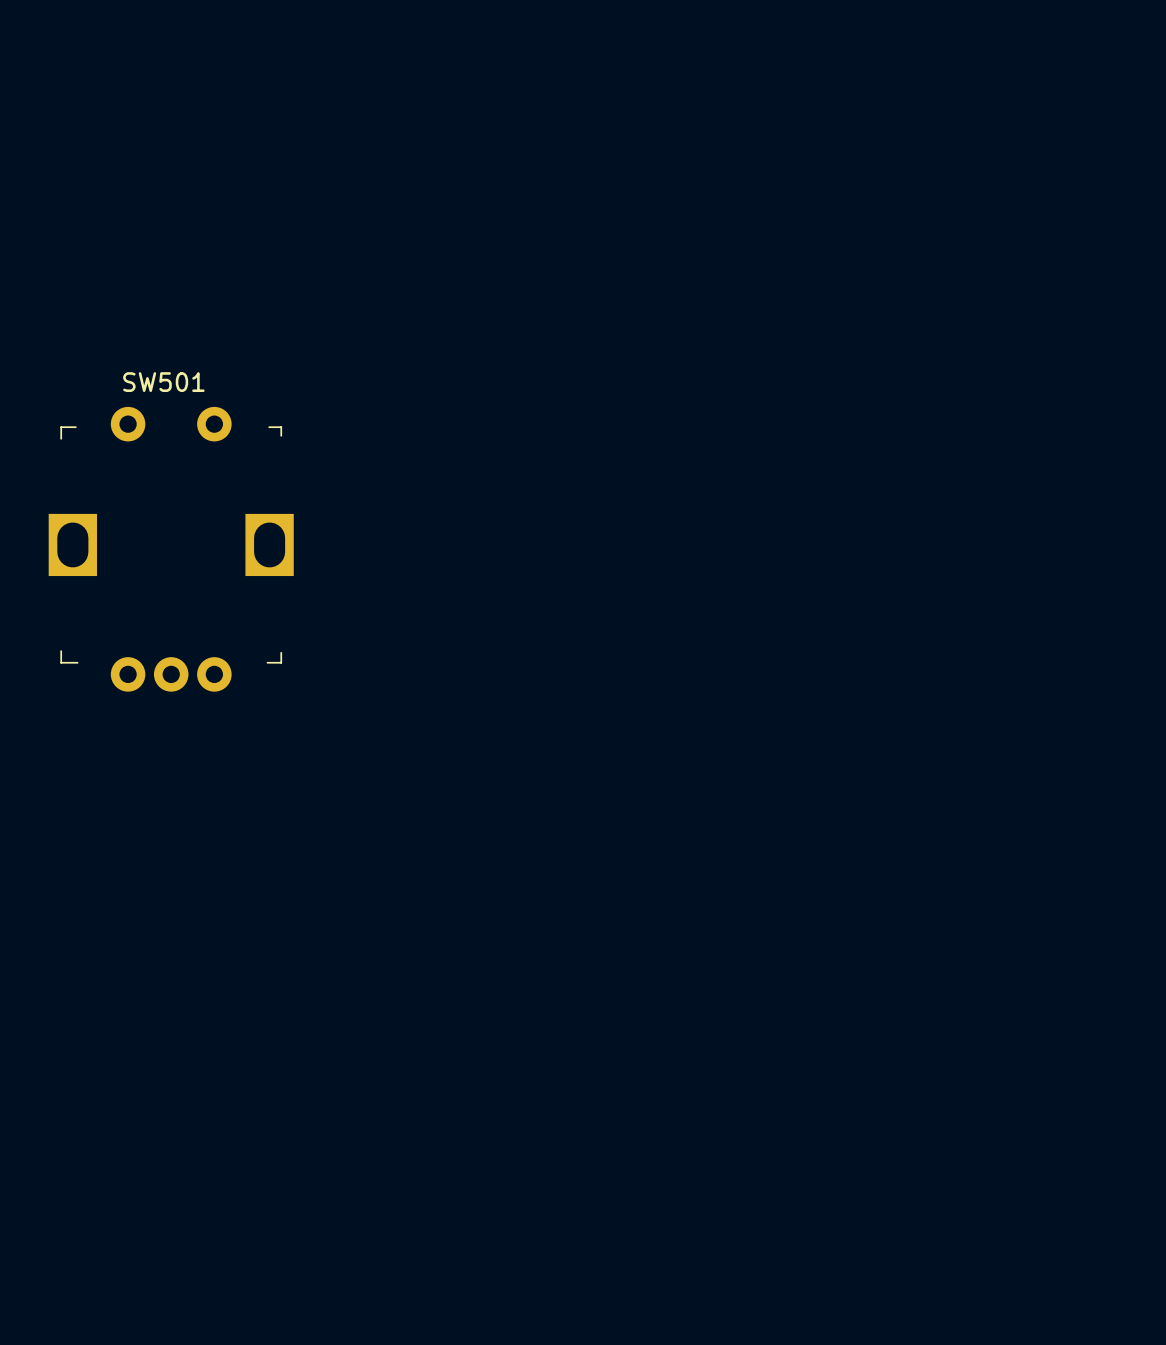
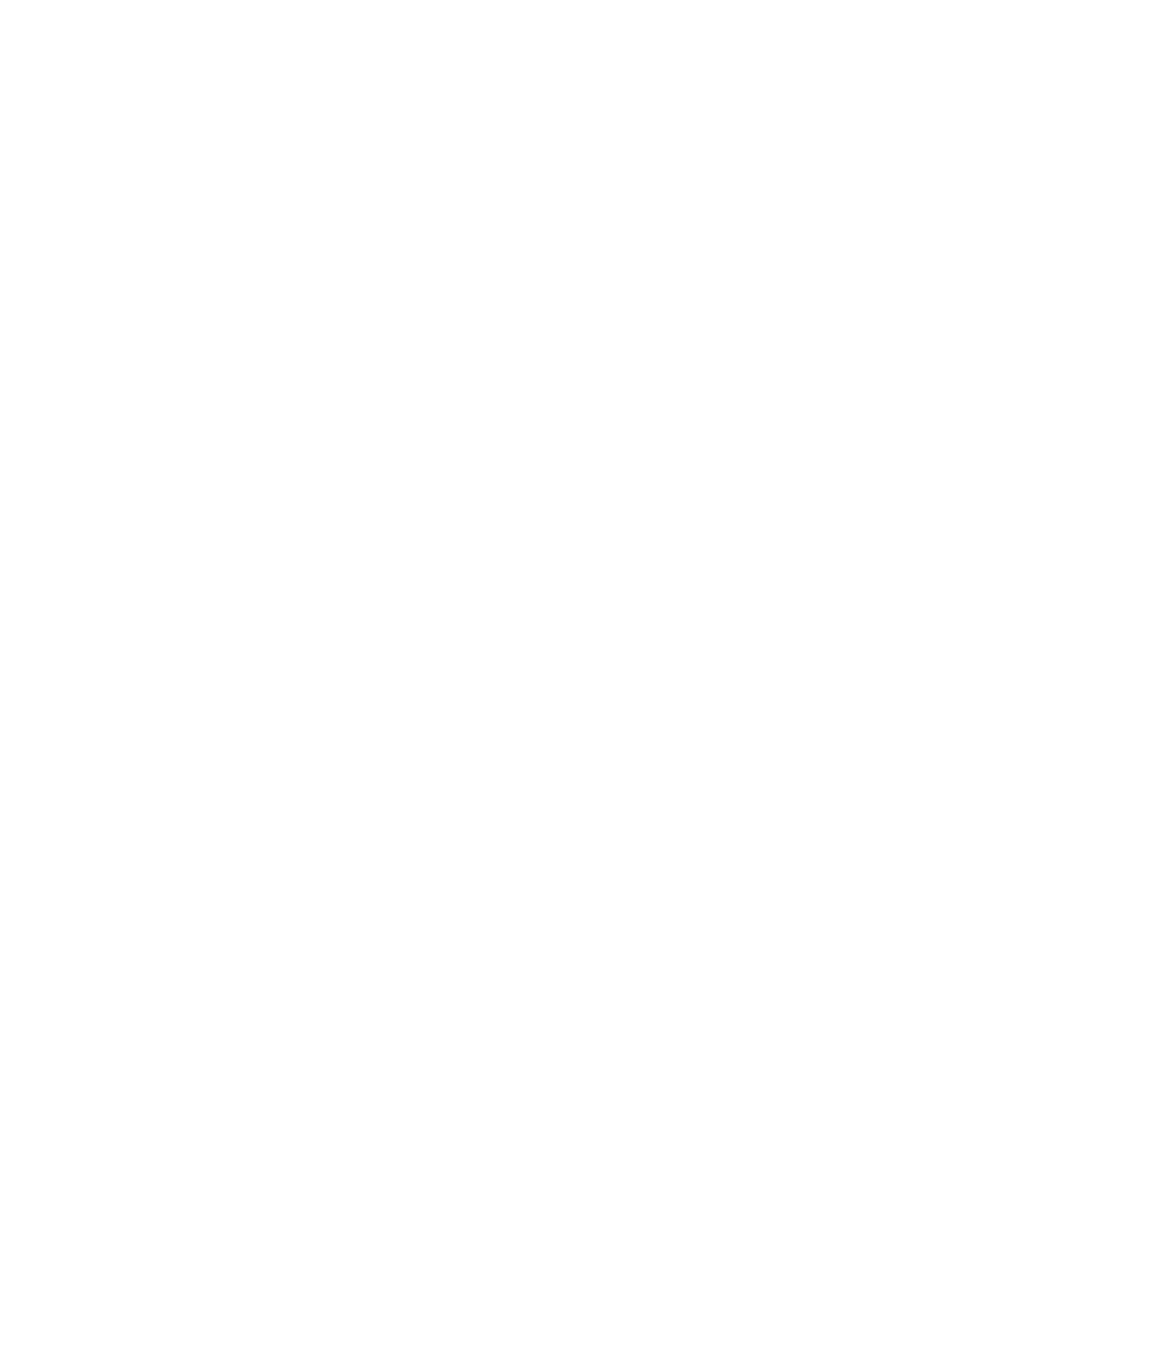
SW501: (171, 549) -> none

